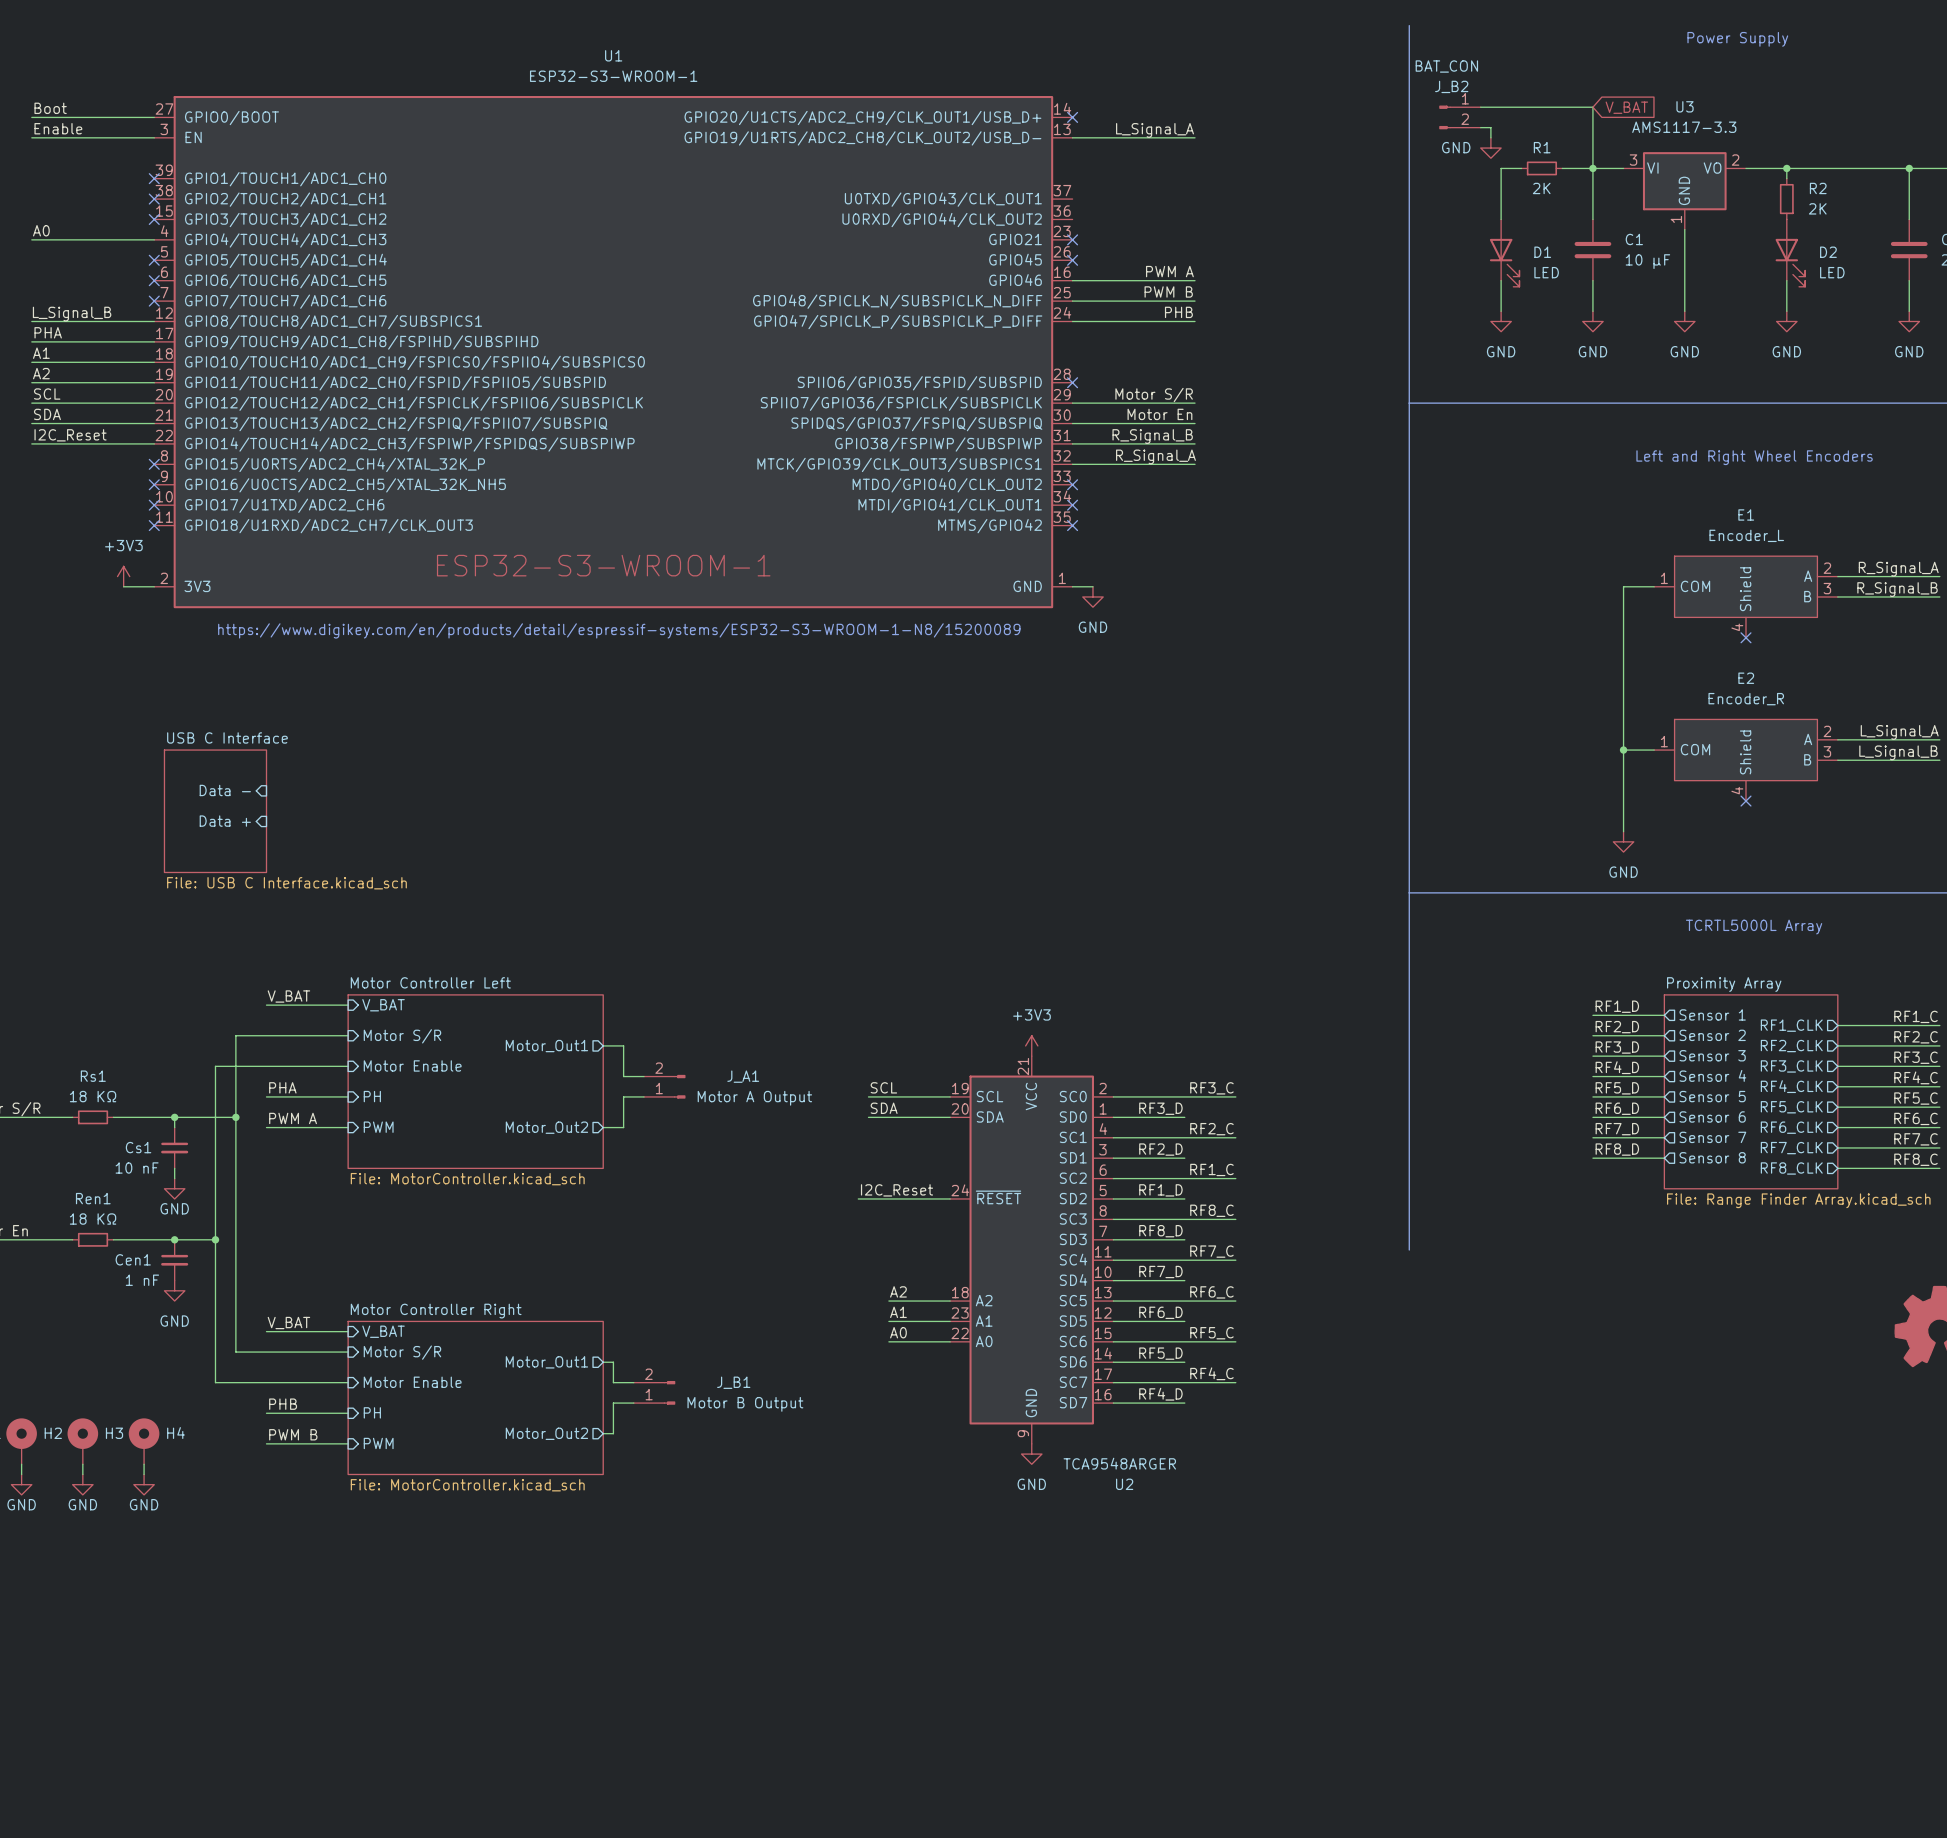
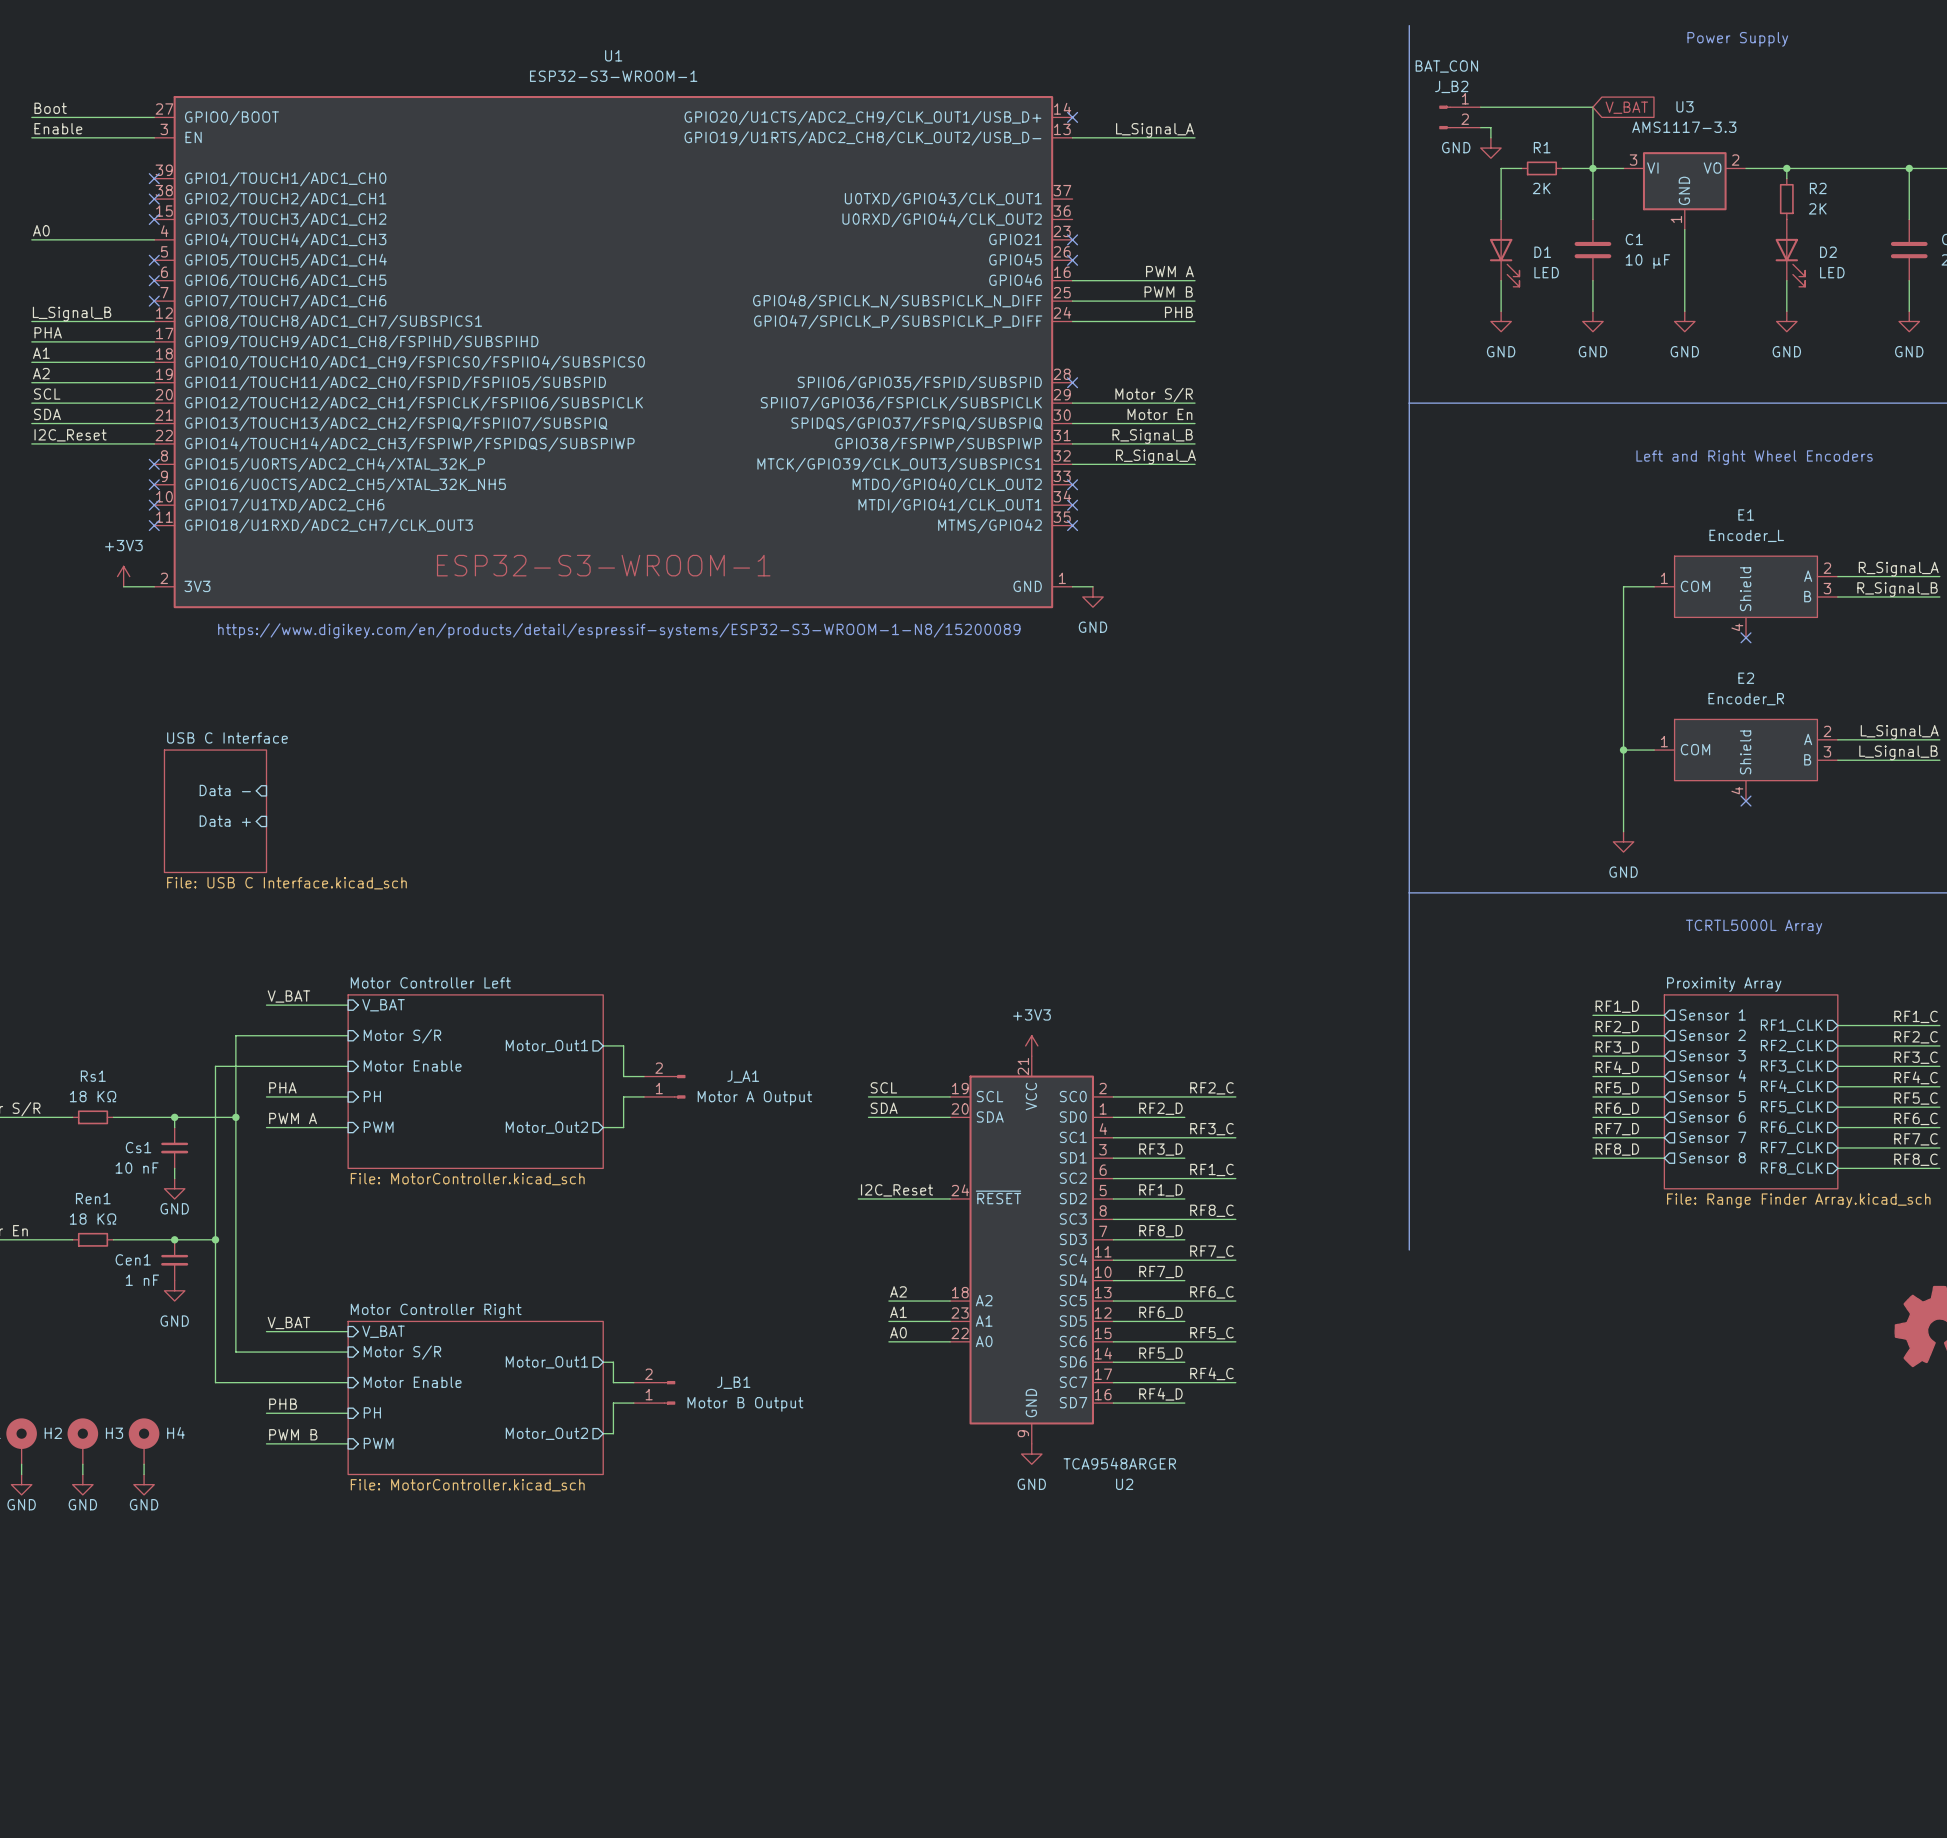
label: RF3_C (1211, 1088) -> RF2_C (1211, 1088)
label: RF3_D (1160, 1108) -> RF2_D (1160, 1108)
label: RF2_C (1211, 1129) -> RF3_C (1211, 1129)
label: RF2_D (1160, 1149) -> RF3_D (1160, 1149)

